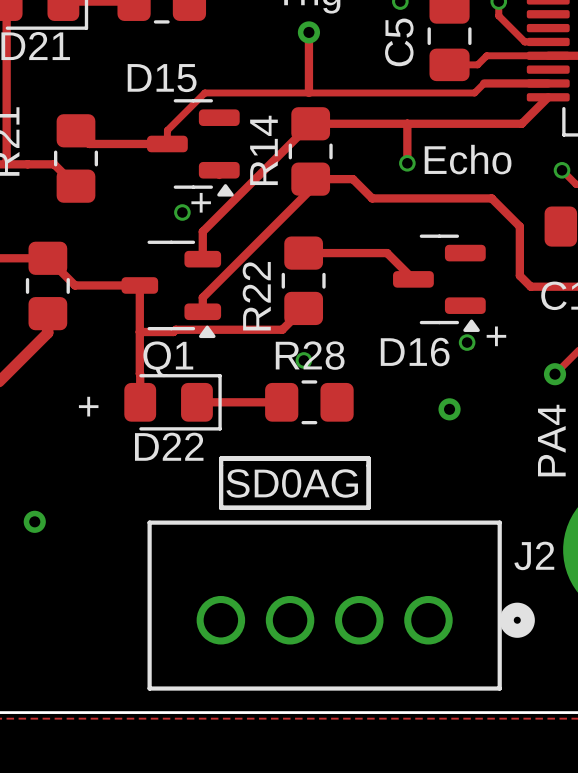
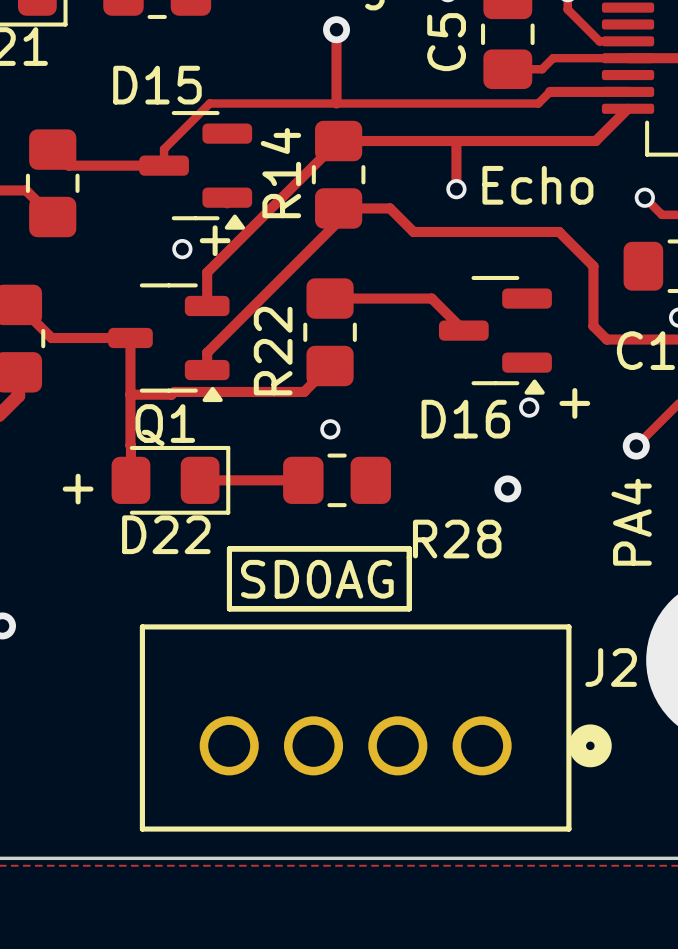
R28 name position: R28 (310, 355) -> R28 (457, 539)

